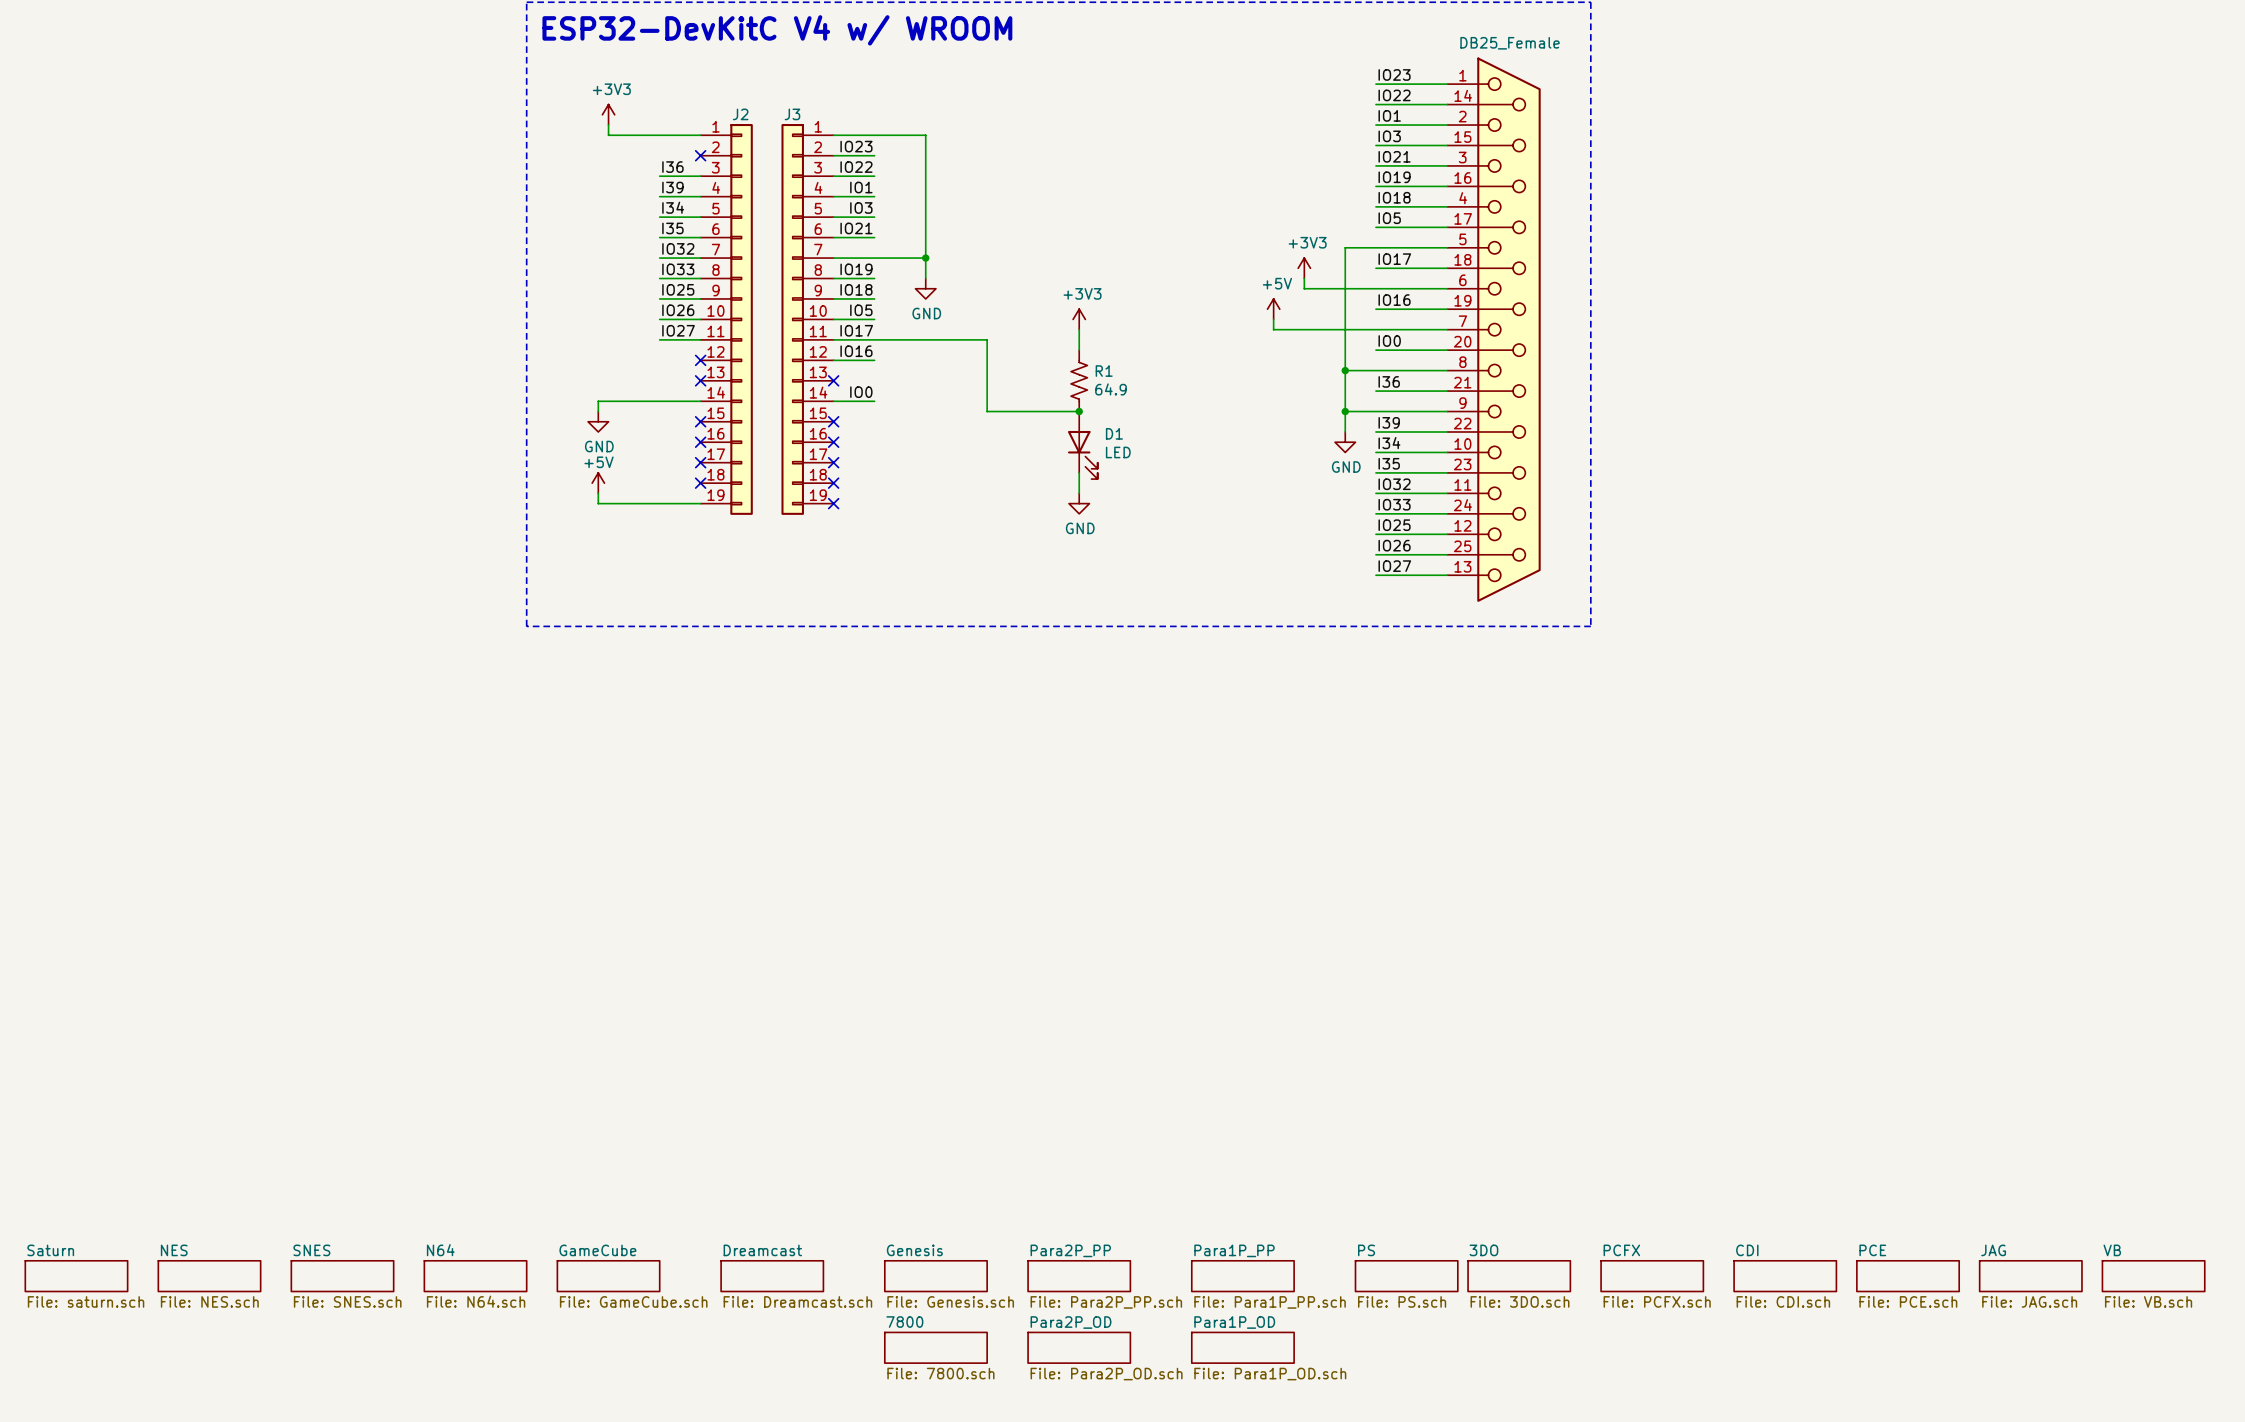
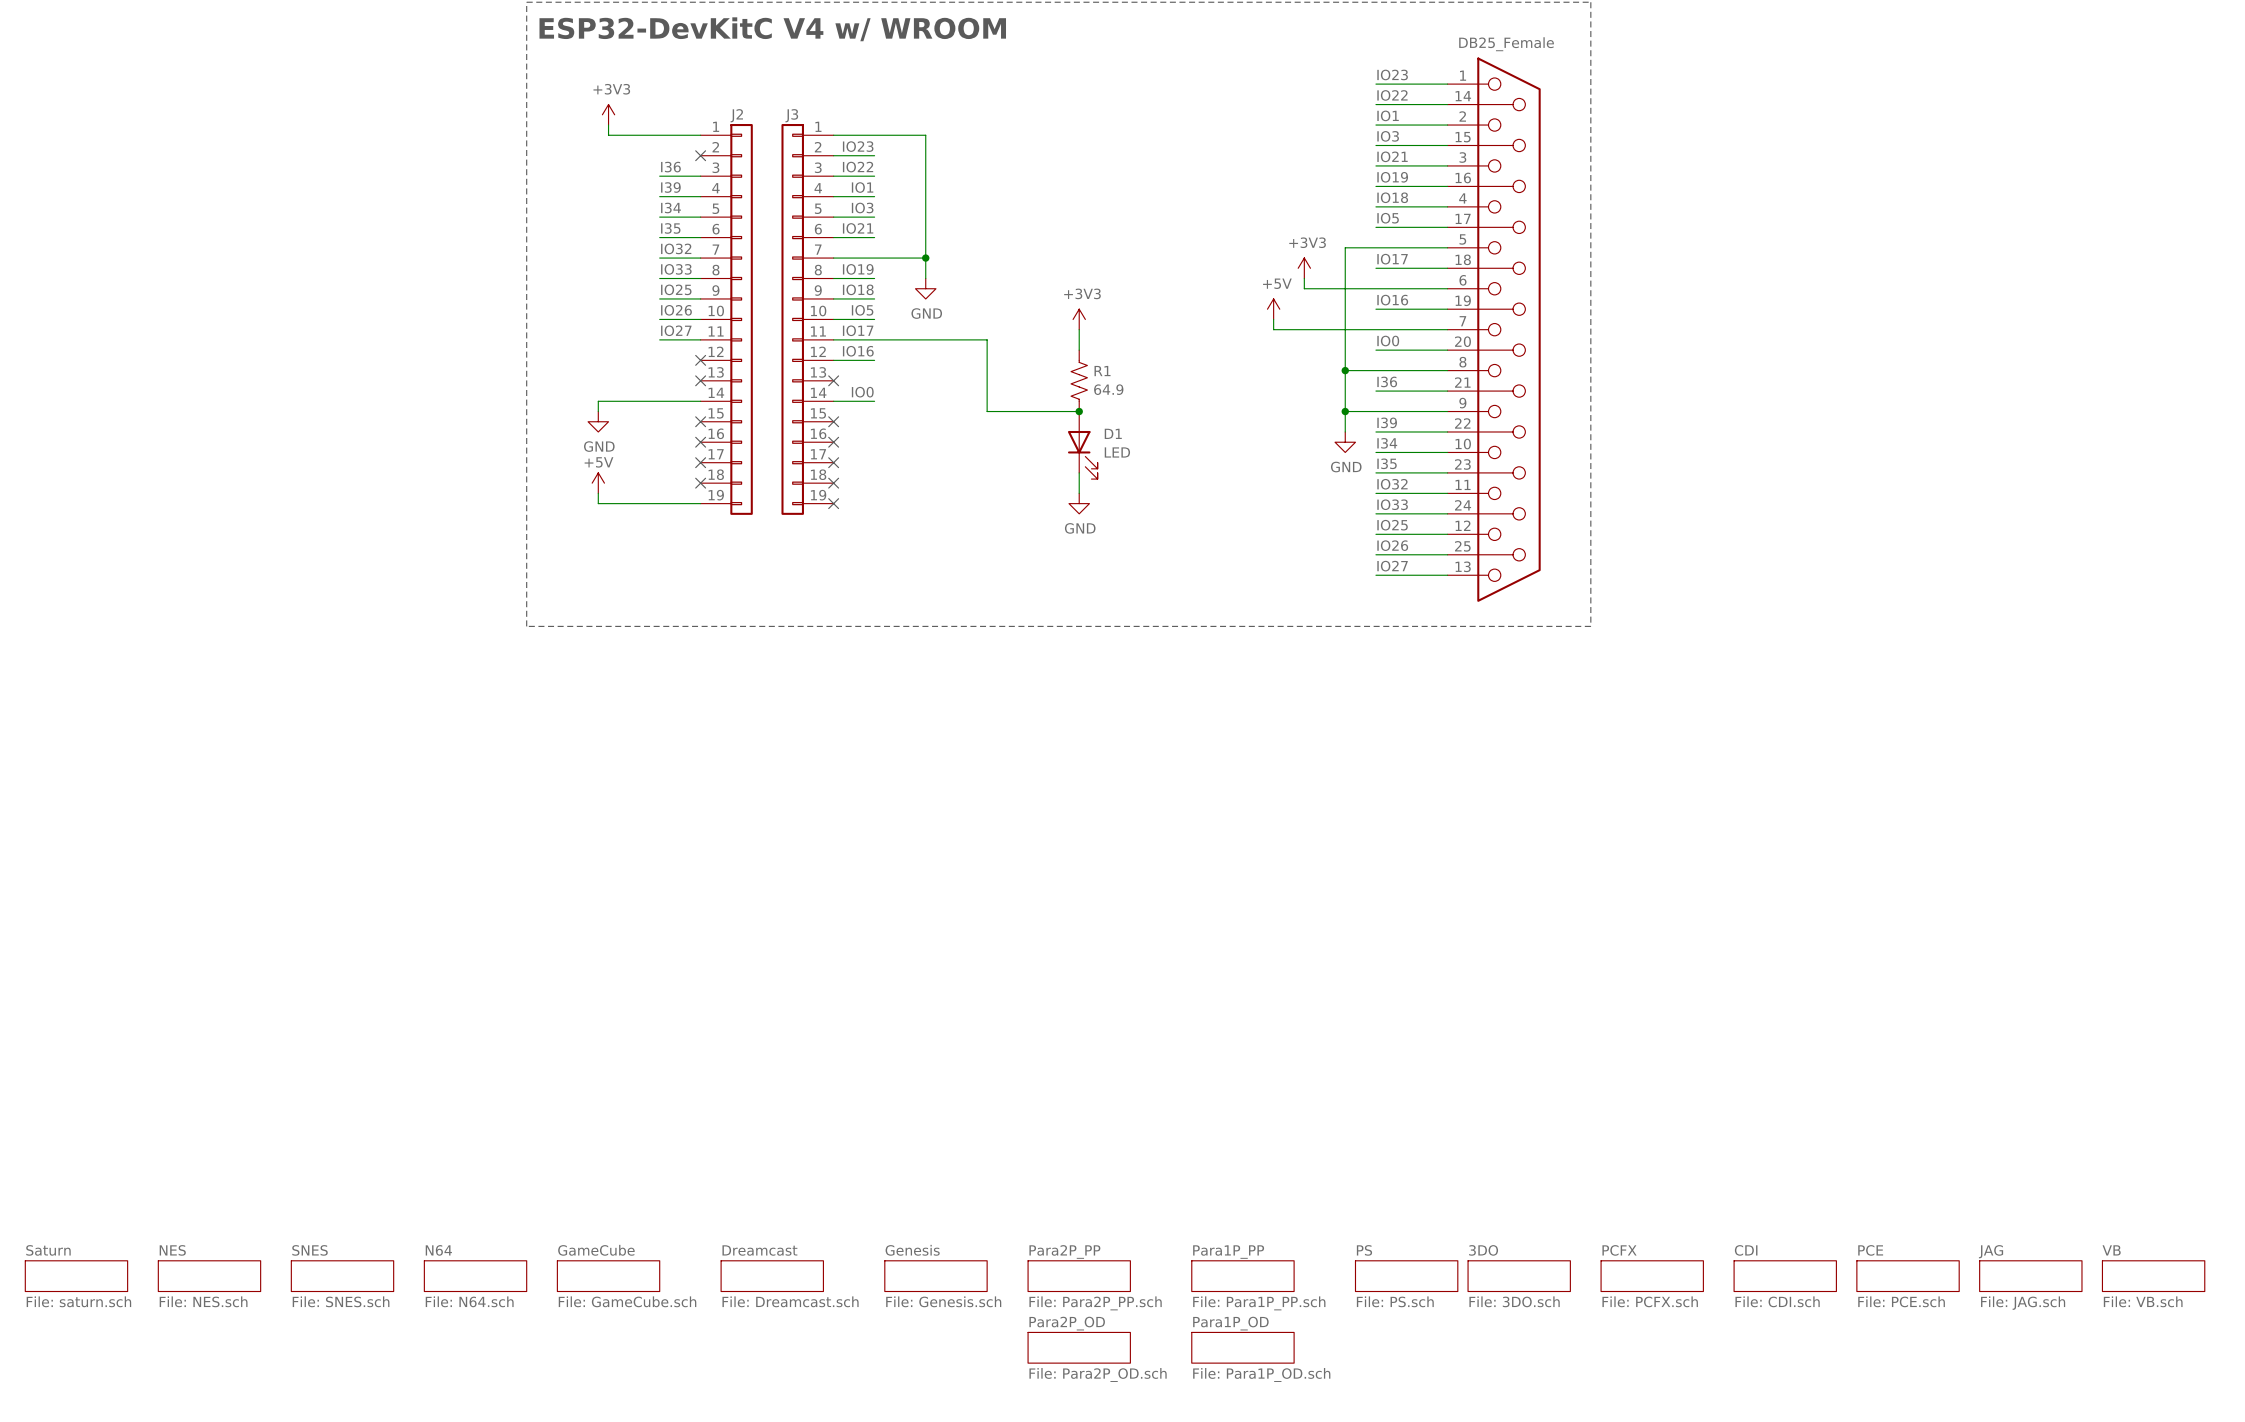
sheet 7800: File: 7800.sch (935, 1347) -> none

